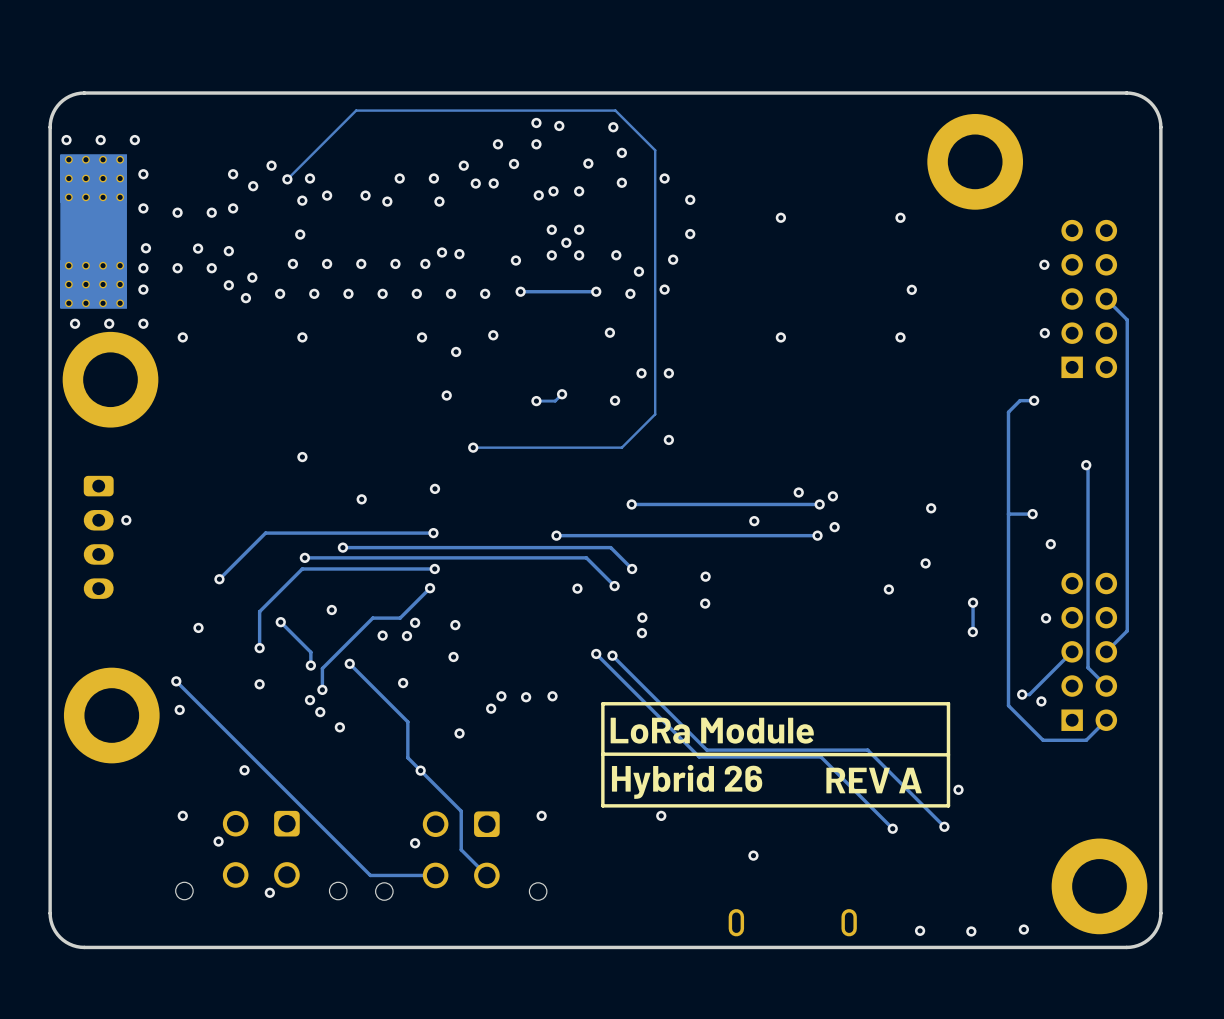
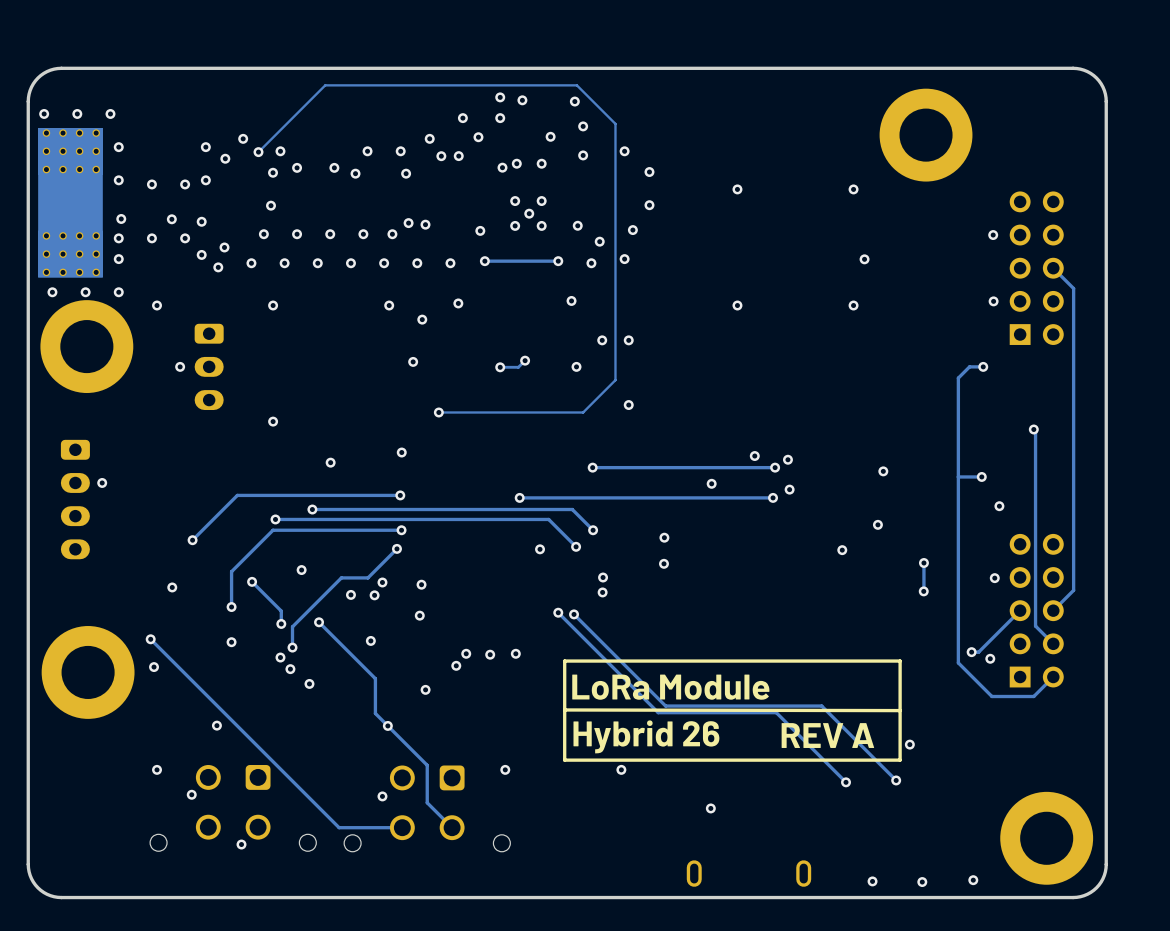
via: none -> (180, 366)
part: none -> (209, 366)

